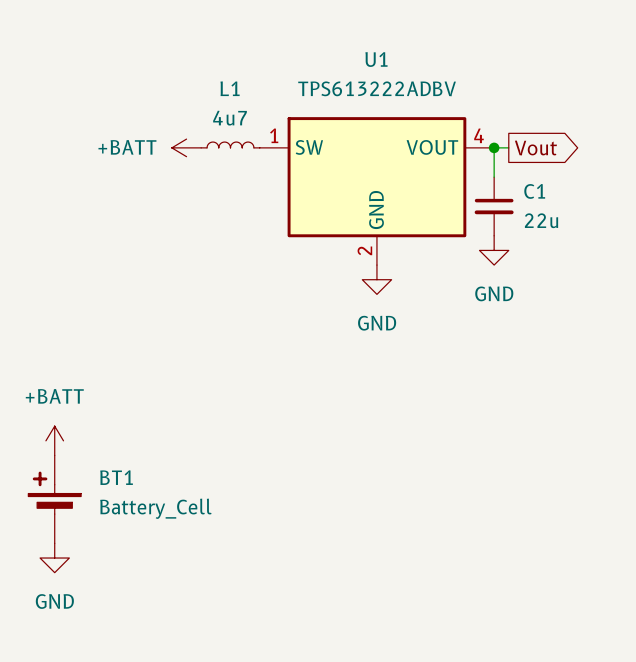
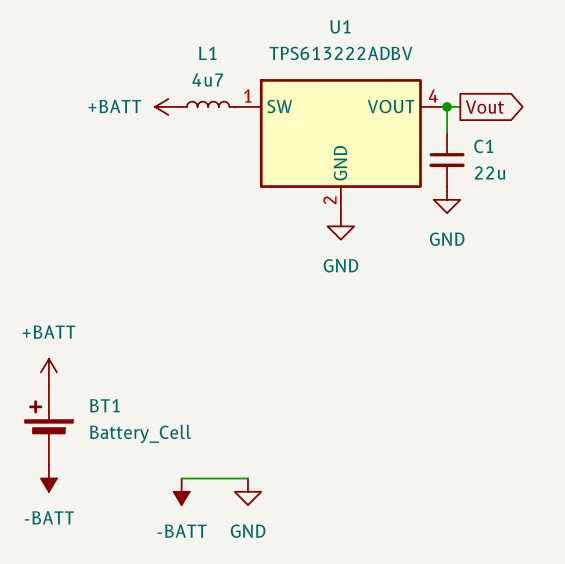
power symbol: GND (54, 558) -> -BATT (48, 478)
wire: none -> (181, 478) (247, 478)
power symbol: none -> -BATT (181, 491)
power symbol: none -> GND (247, 491)

